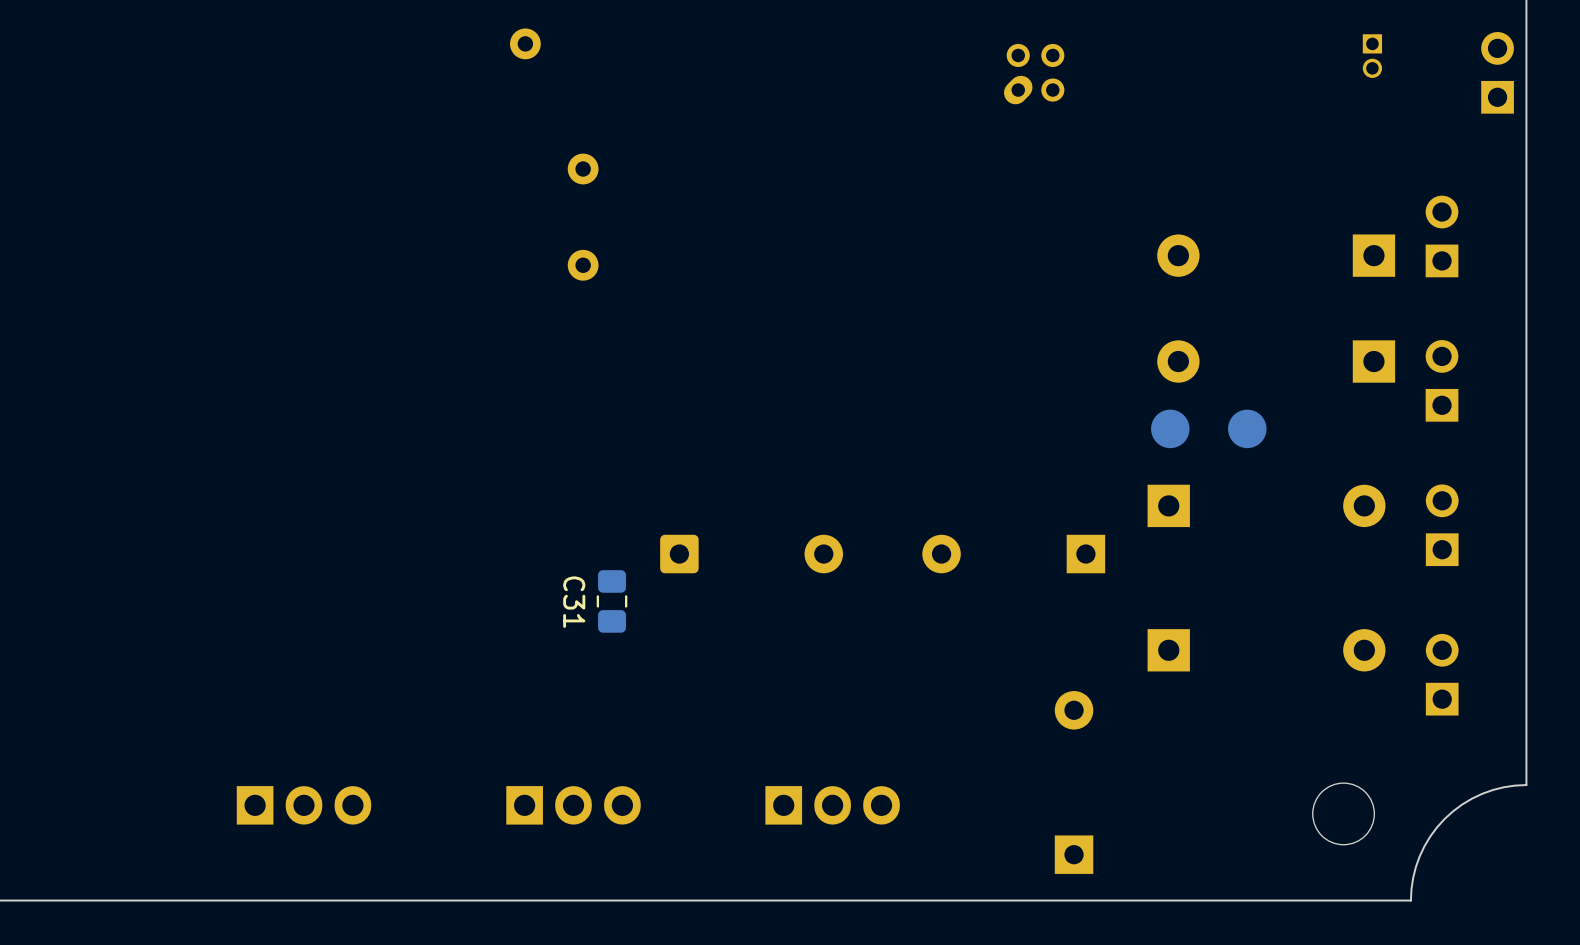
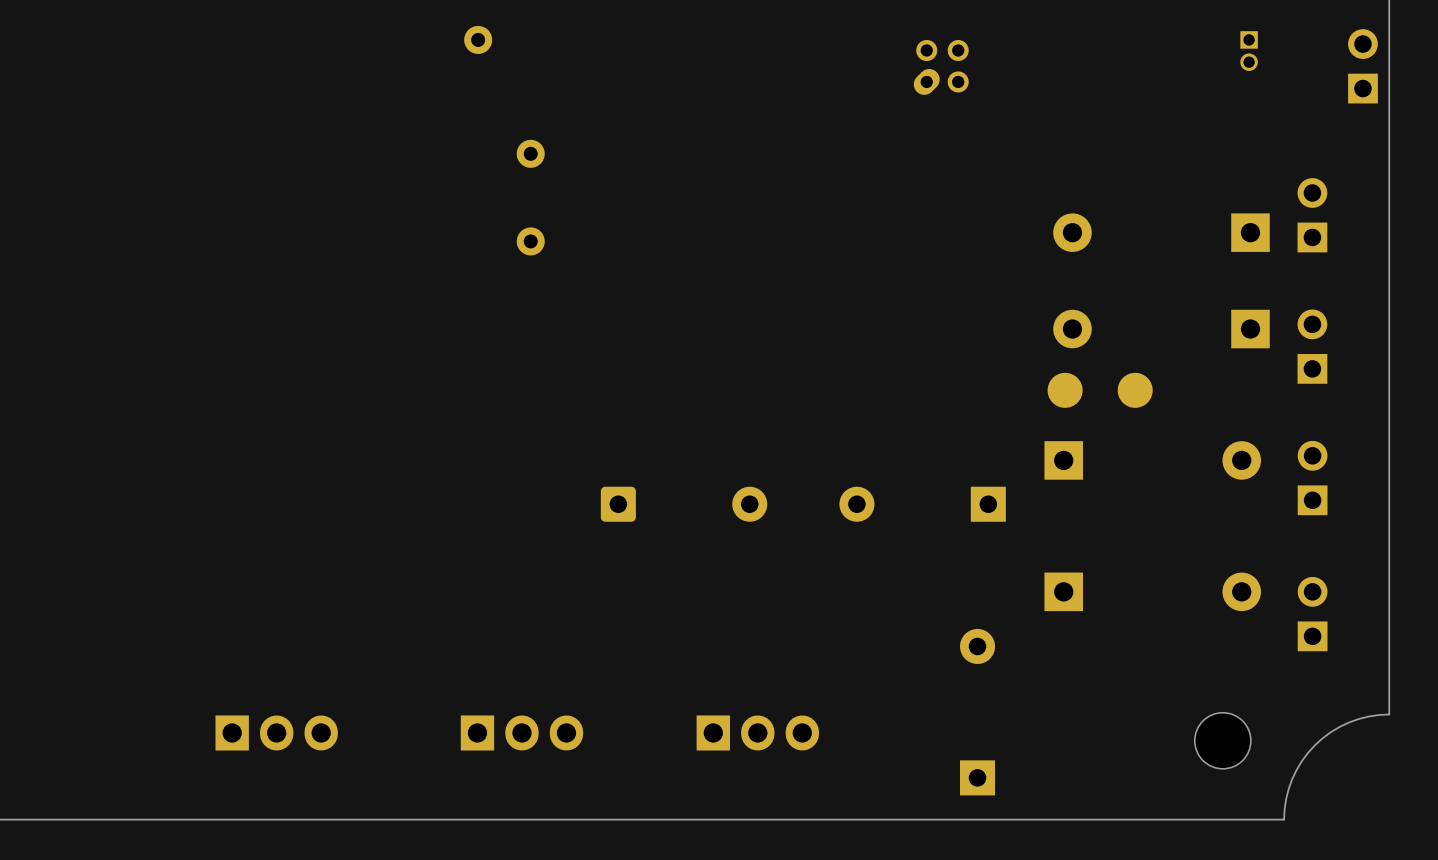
C31: (612, 601) -> none

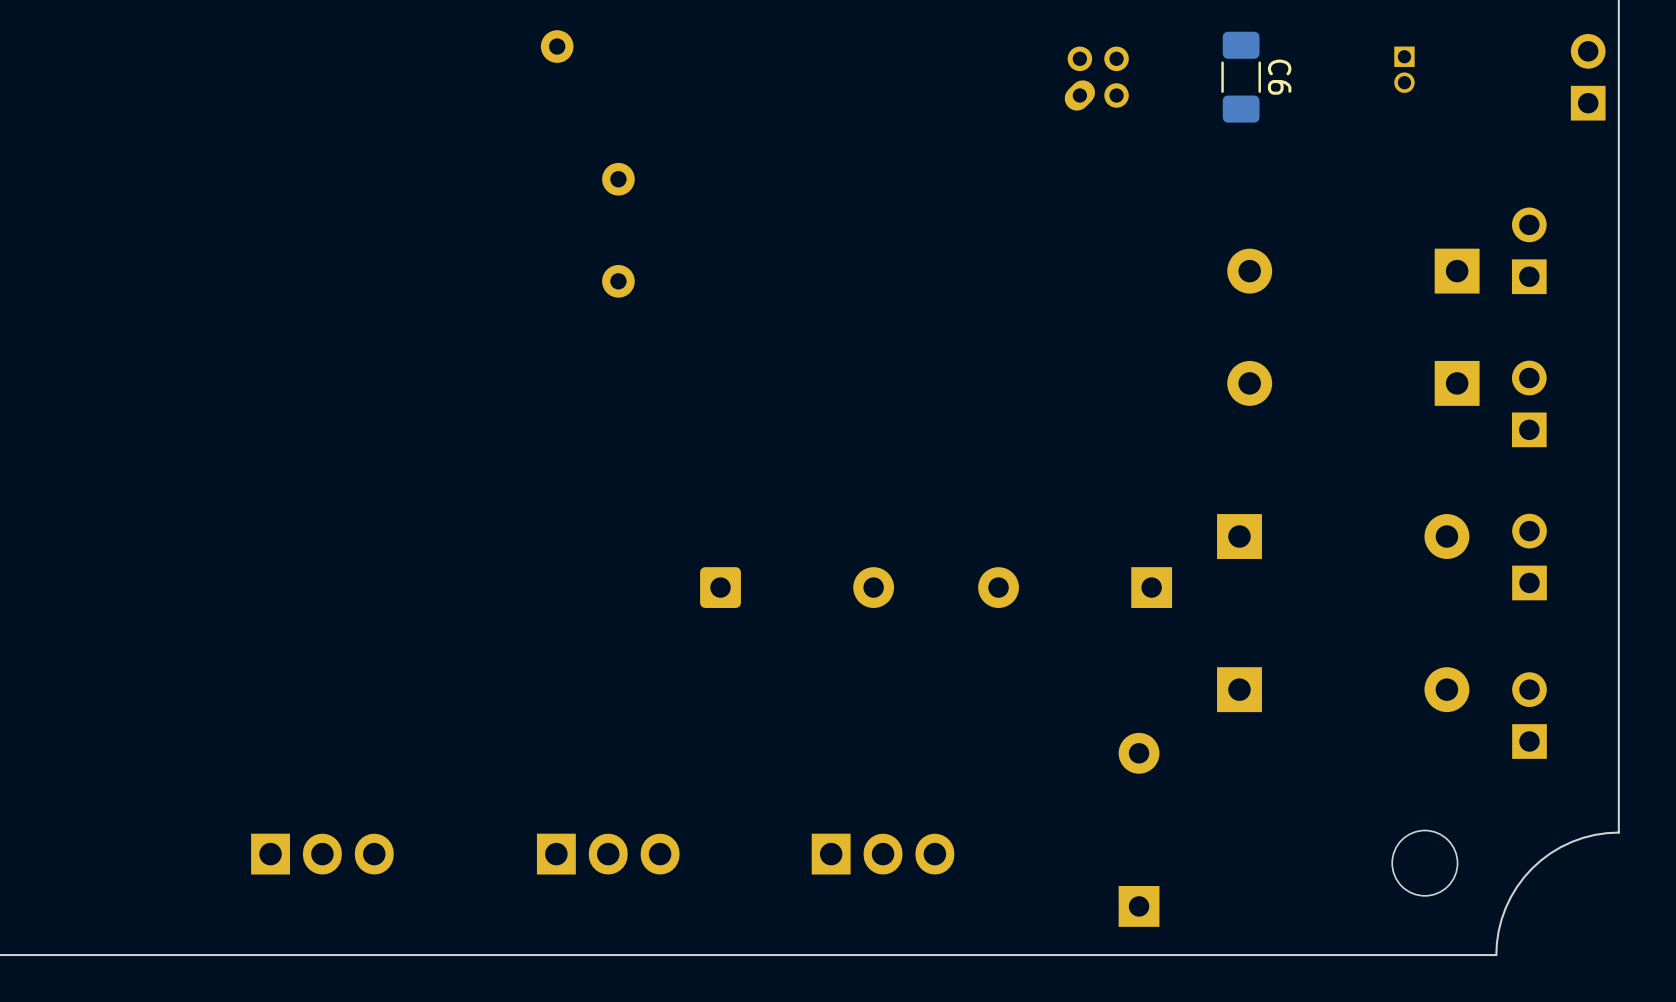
part position: (1249, 51) -> (1404, 69)
C6: none -> (1241, 77)
part: (1100, 390) -> none

